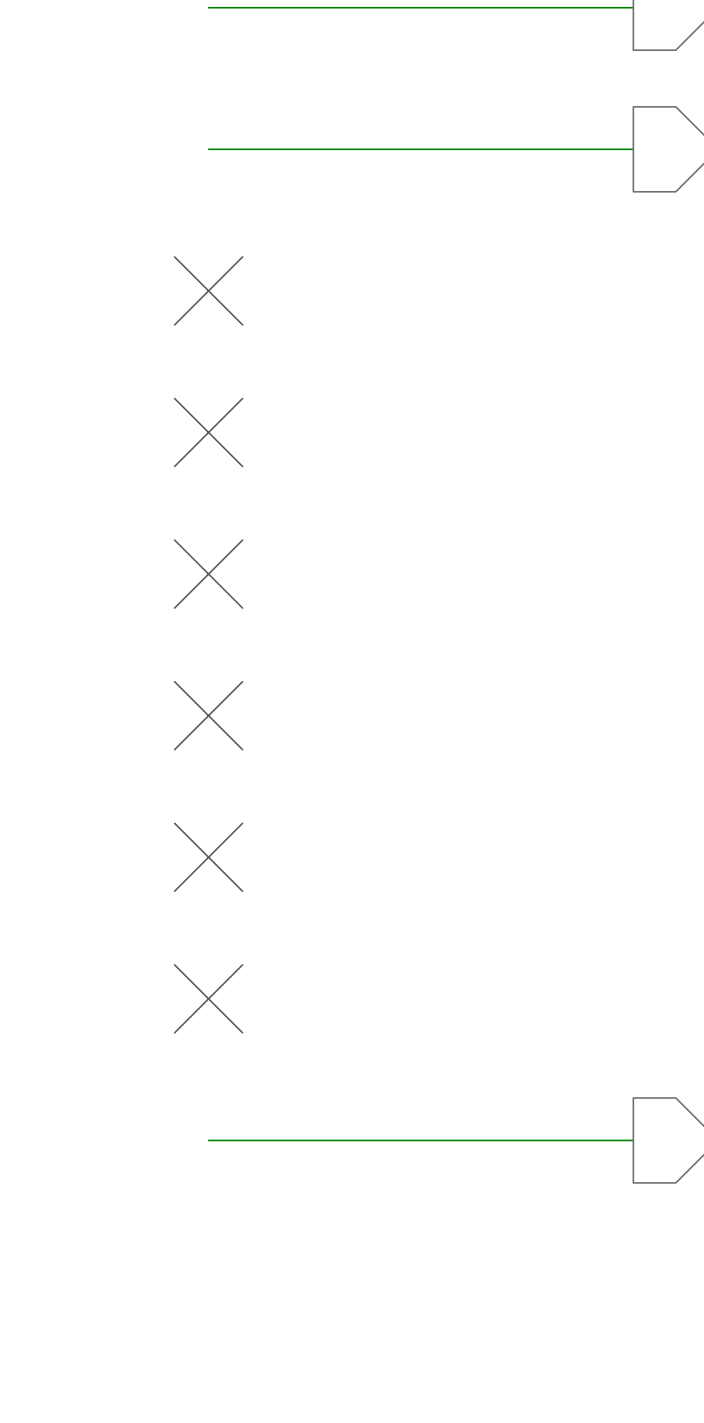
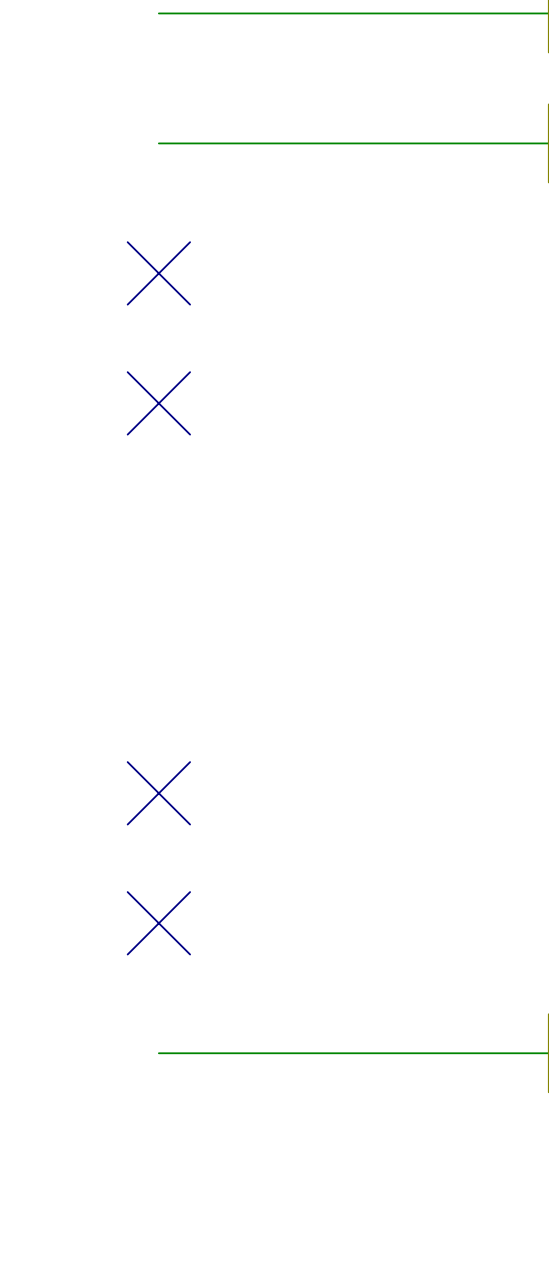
no-connect mark: (208, 574) -> none
no-connect mark: (208, 715) -> none

